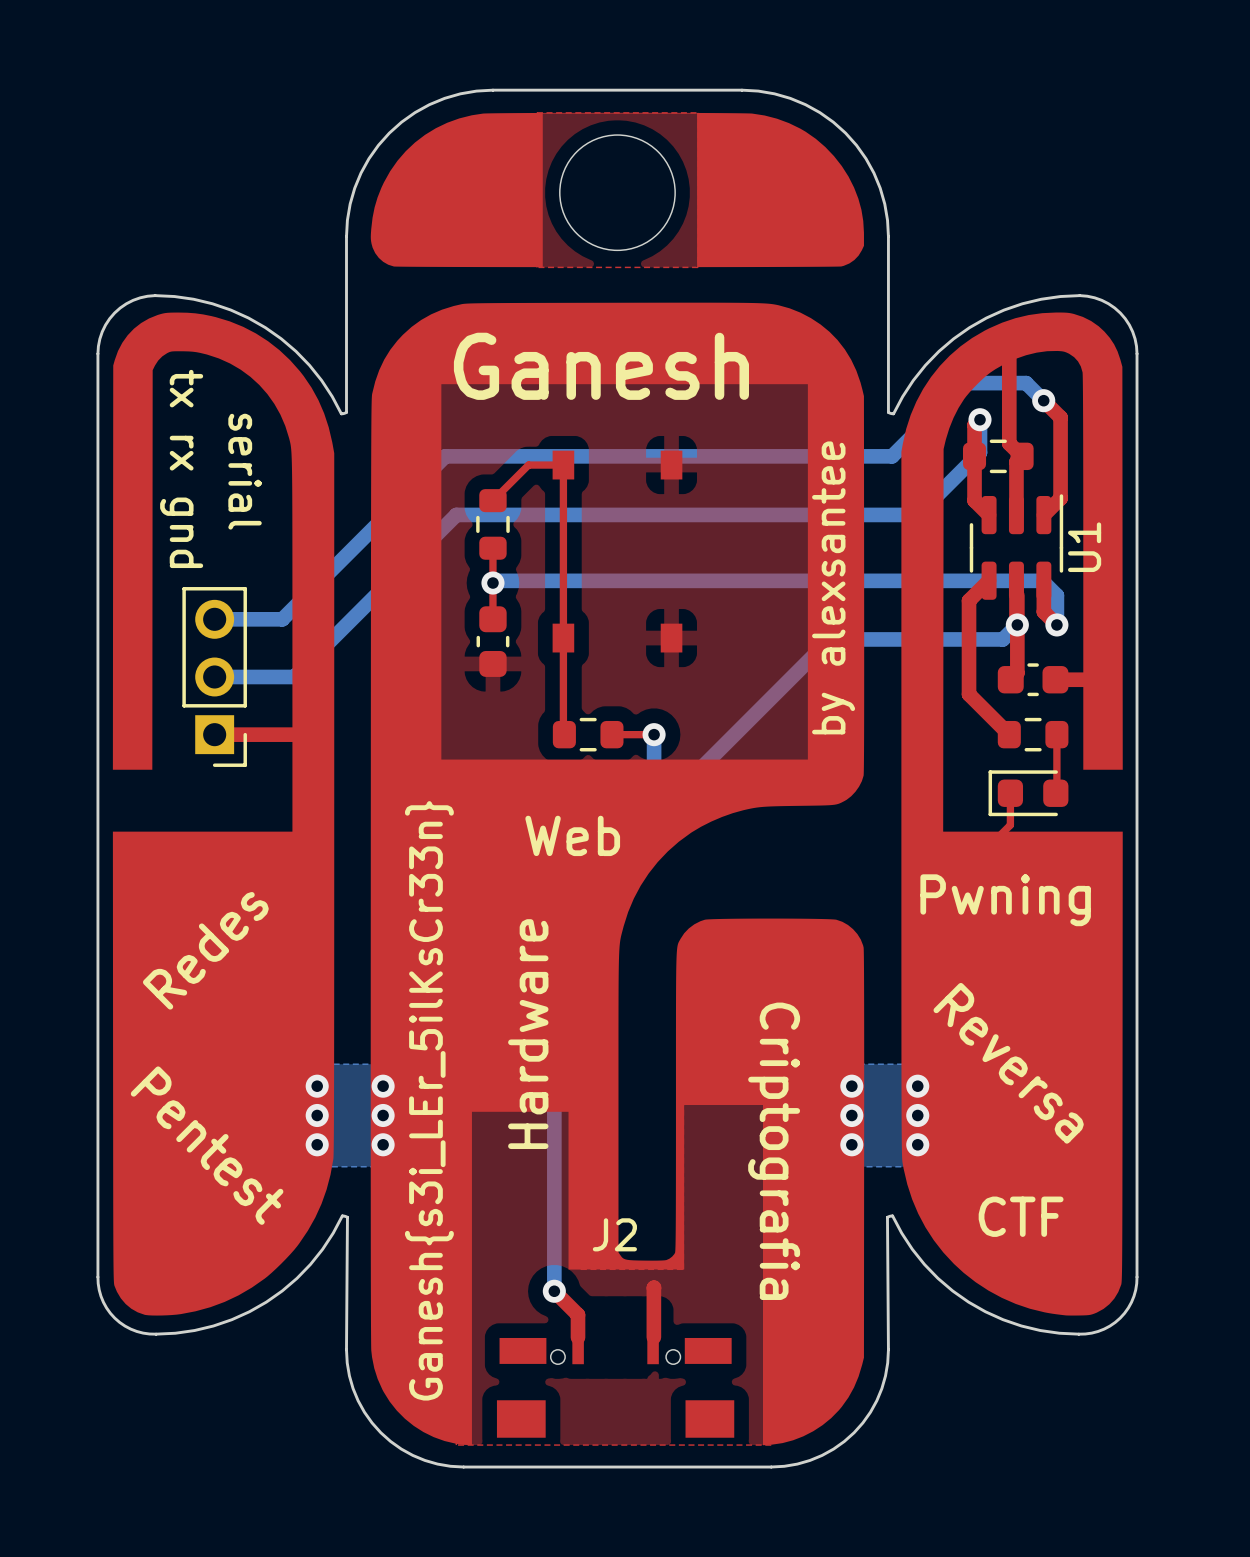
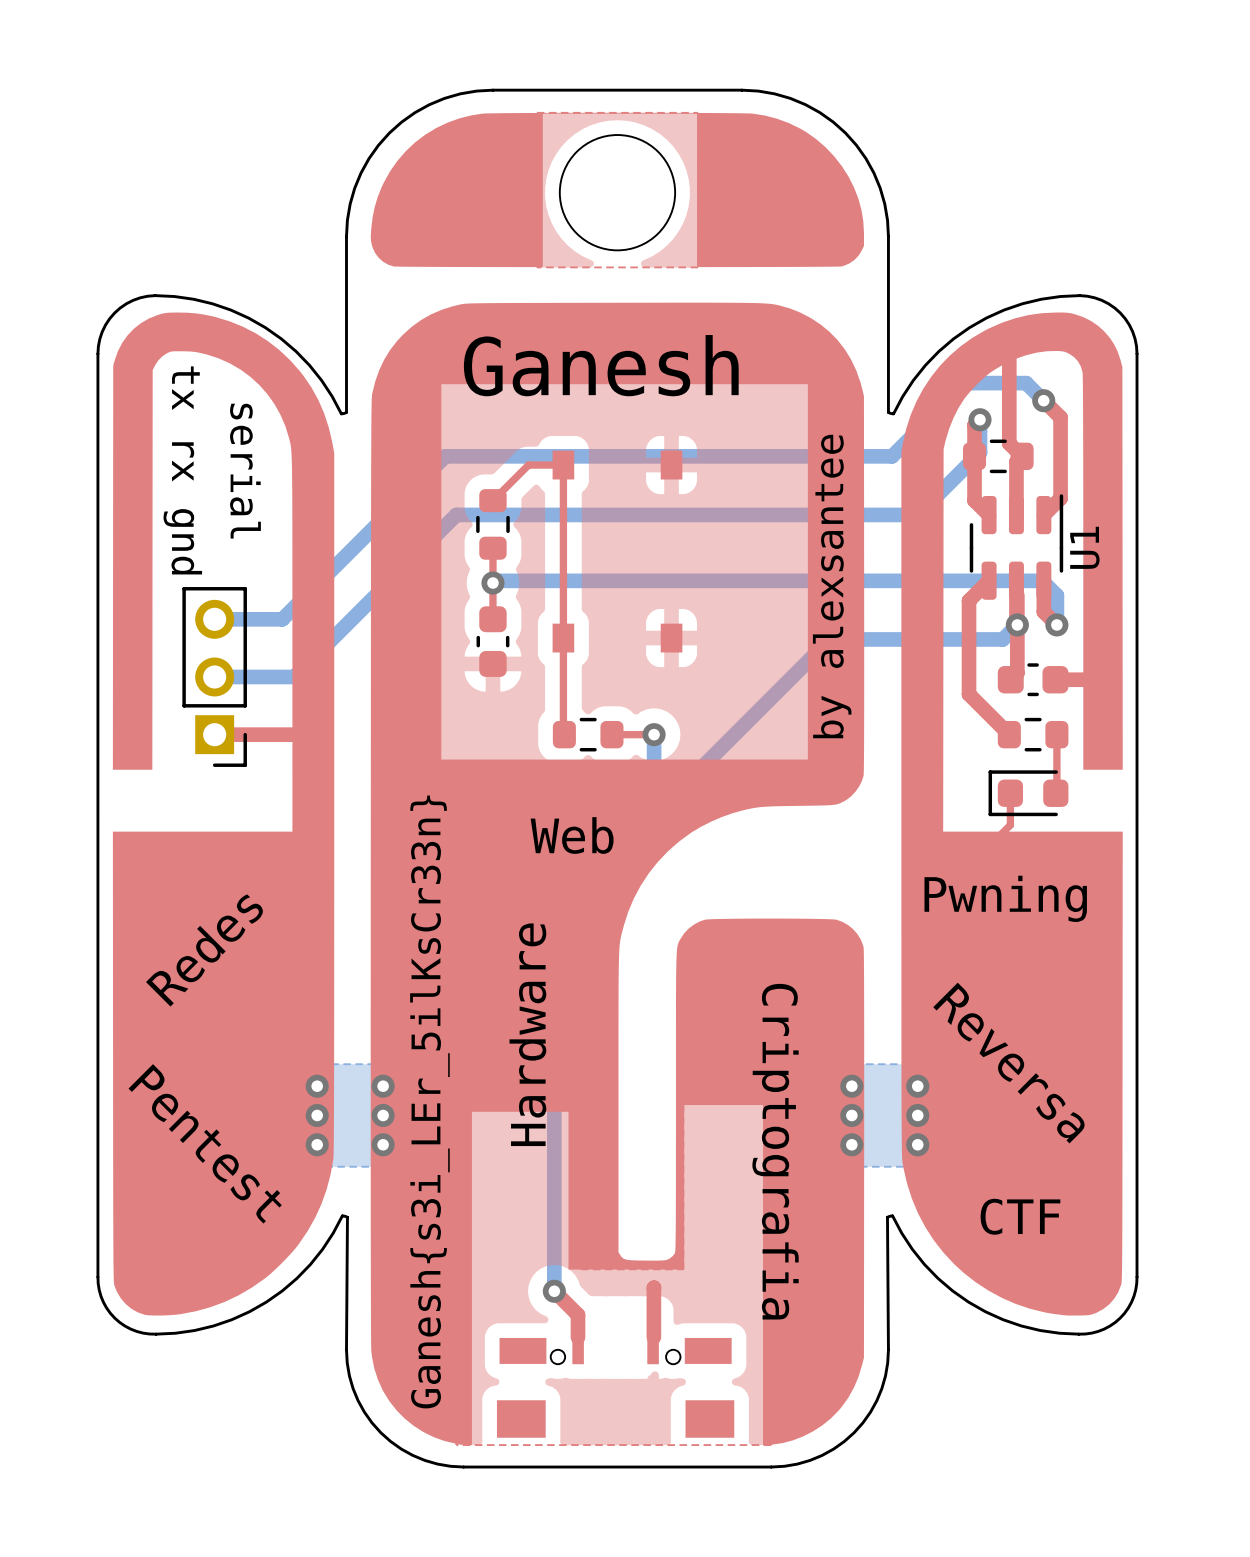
J2 name: J2 (614, 1234) -> none

